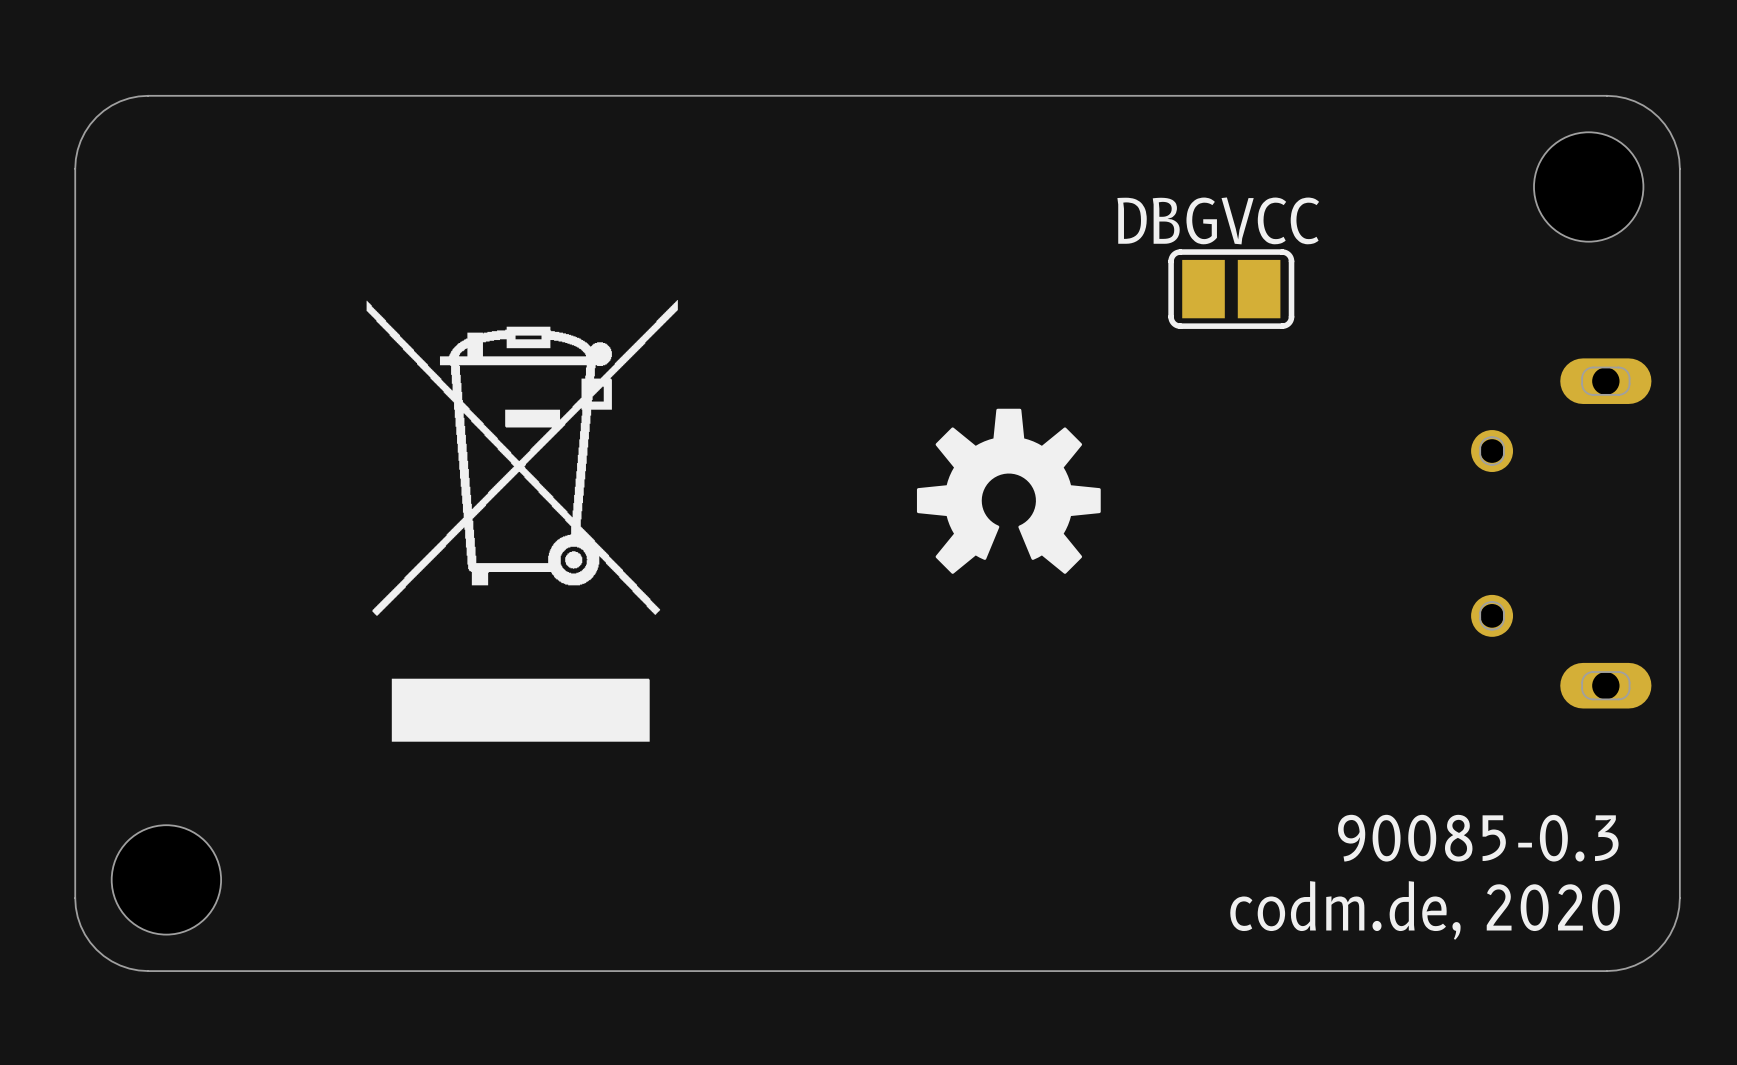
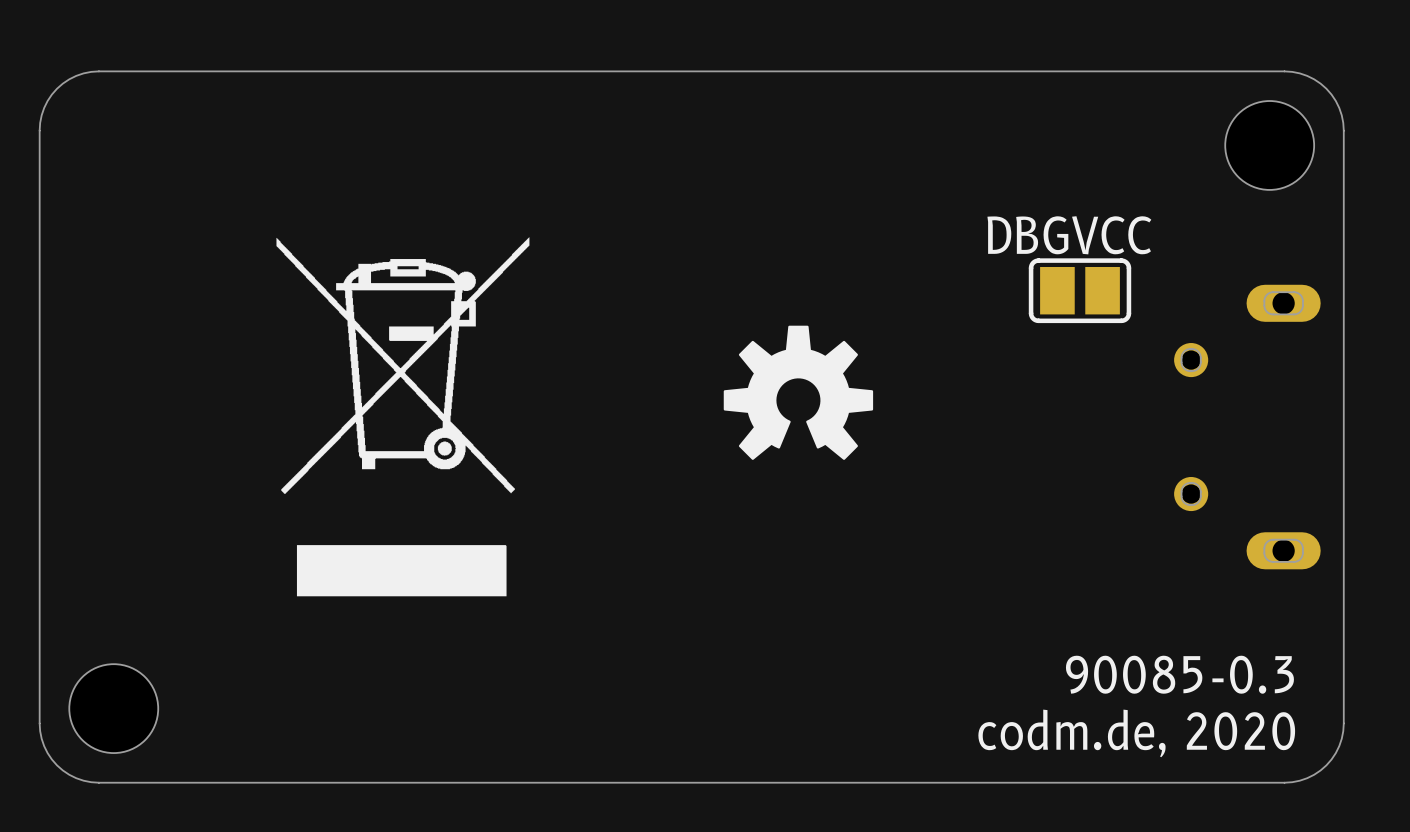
DBGVCC position: (1231, 289) -> (1080, 290)

